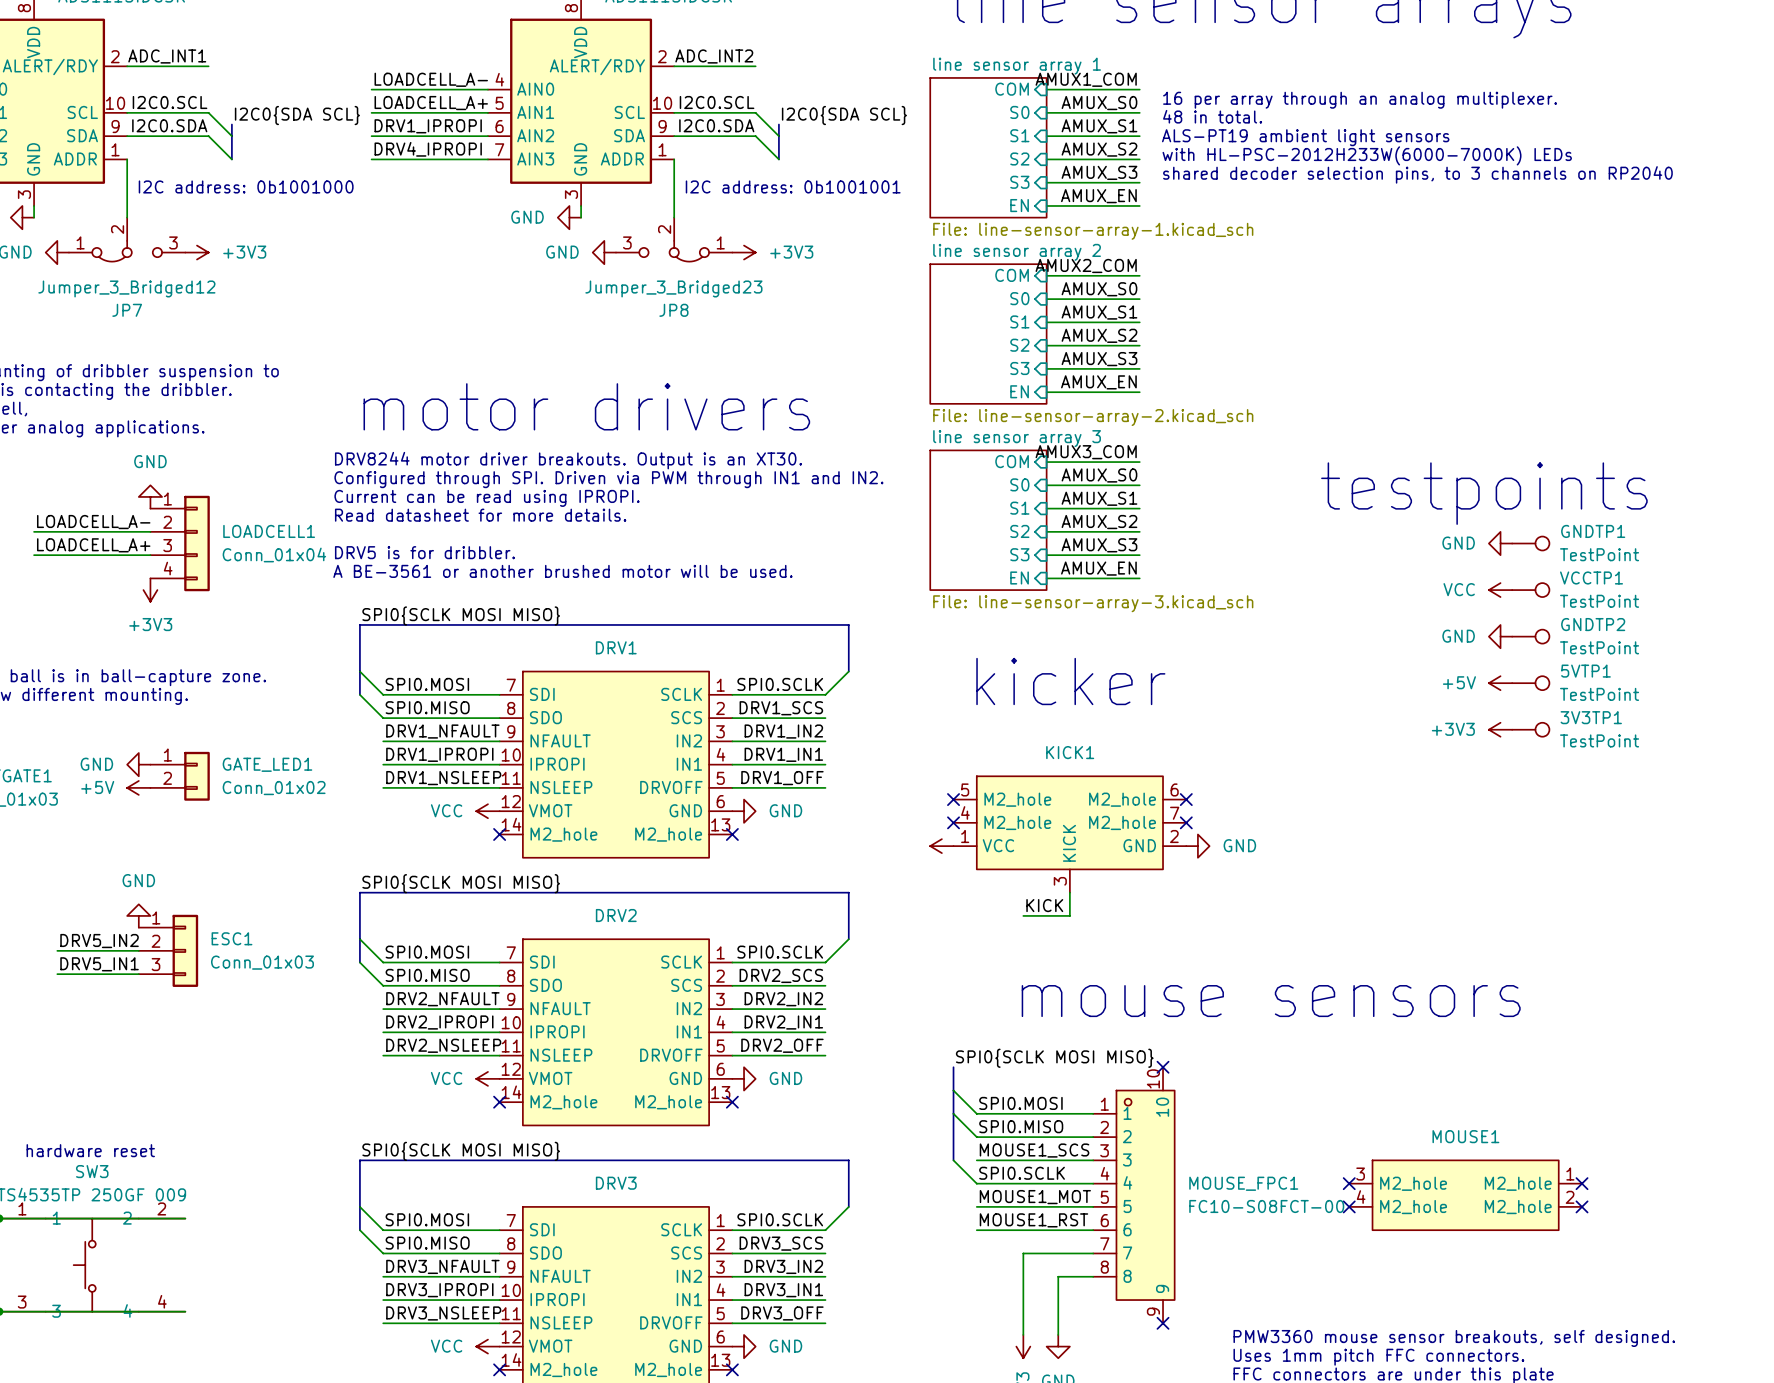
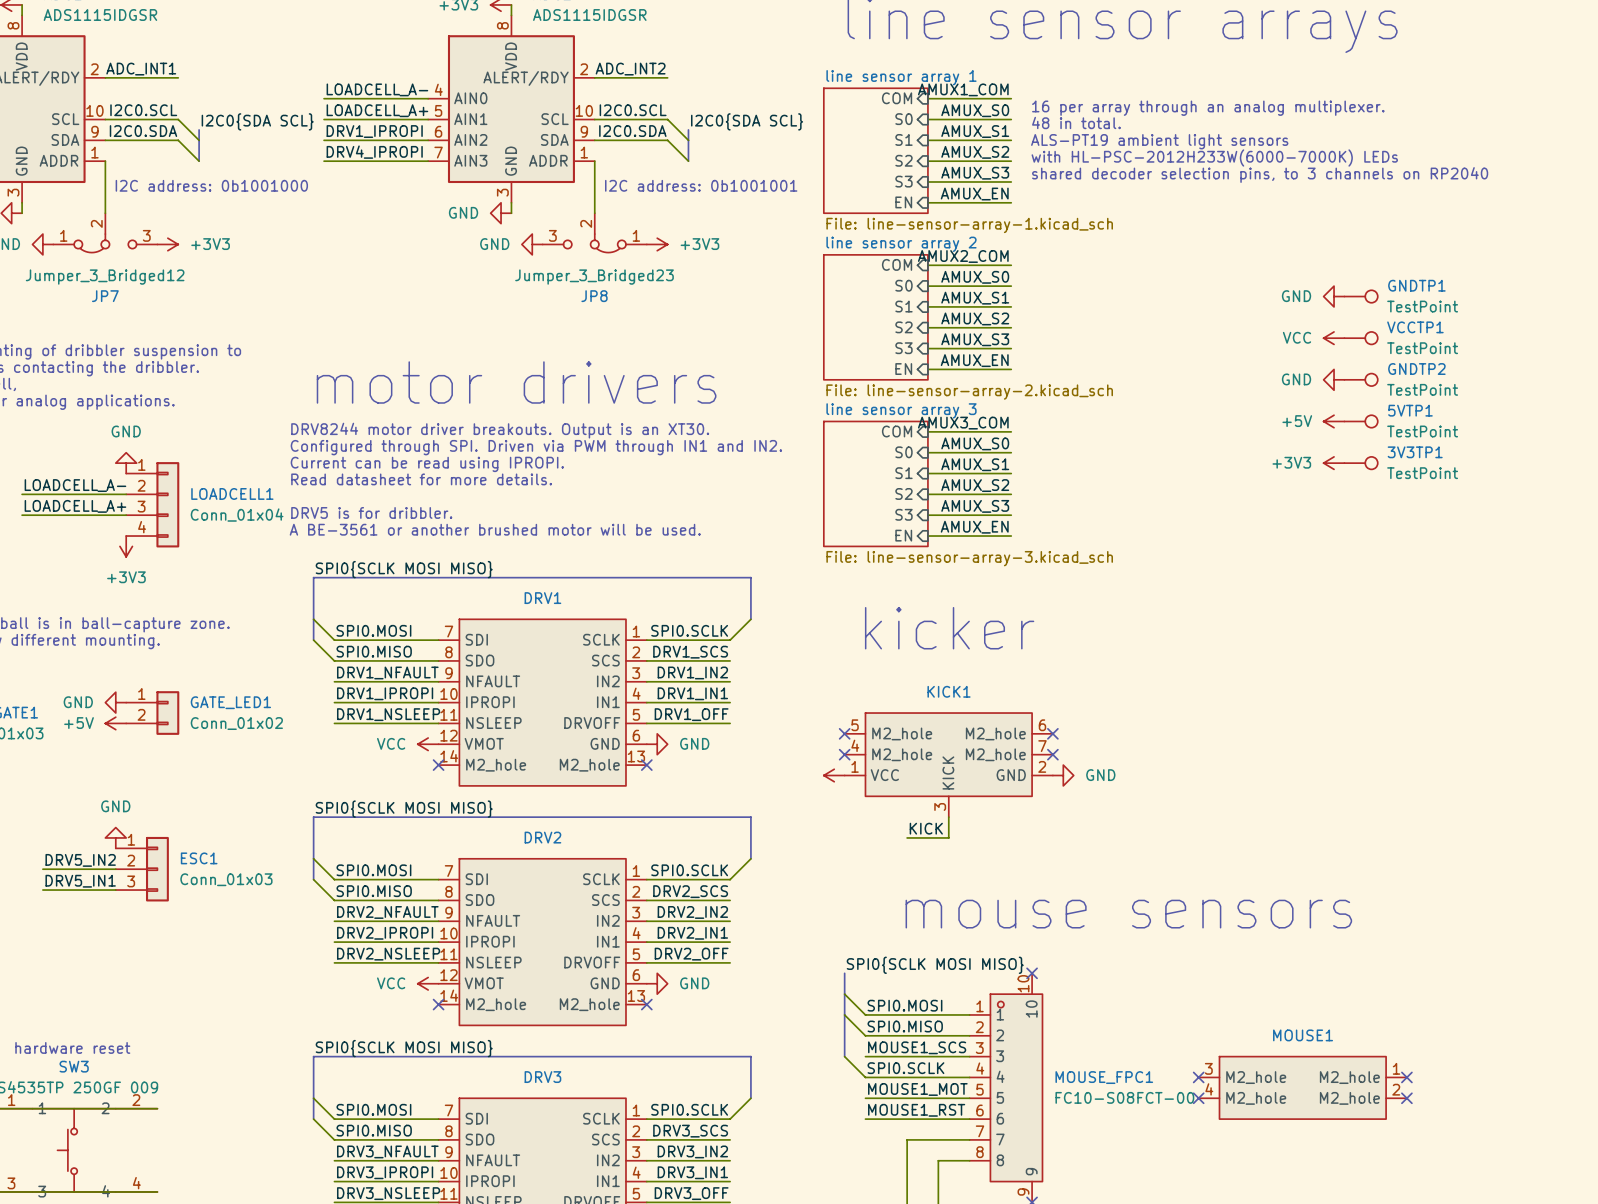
power symbol: none -> GND (1334, 296)
power symbol: none -> VCC (1334, 338)
power symbol: none -> GND (1334, 379)
power symbol: none -> +5V (1334, 421)
text: testpoints (1484, 493) -> none
power symbol: none -> +3V3 (1334, 463)
power symbol: GND (1500, 543) -> none
GNDTP1 position: (1530, 543) -> (1361, 296)
power symbol: VCC (1500, 590) -> none
VCCTP1 position: (1530, 590) -> (1361, 338)
power symbol: GND (1500, 636) -> none
GNDTP2 position: (1530, 636) -> (1361, 379)
power symbol: +5V (1500, 683) -> none
5VTP1 position: (1530, 683) -> (1361, 421)
power symbol: +3V3 (1500, 729) -> none
3V3TP1 position: (1530, 729) -> (1361, 463)

